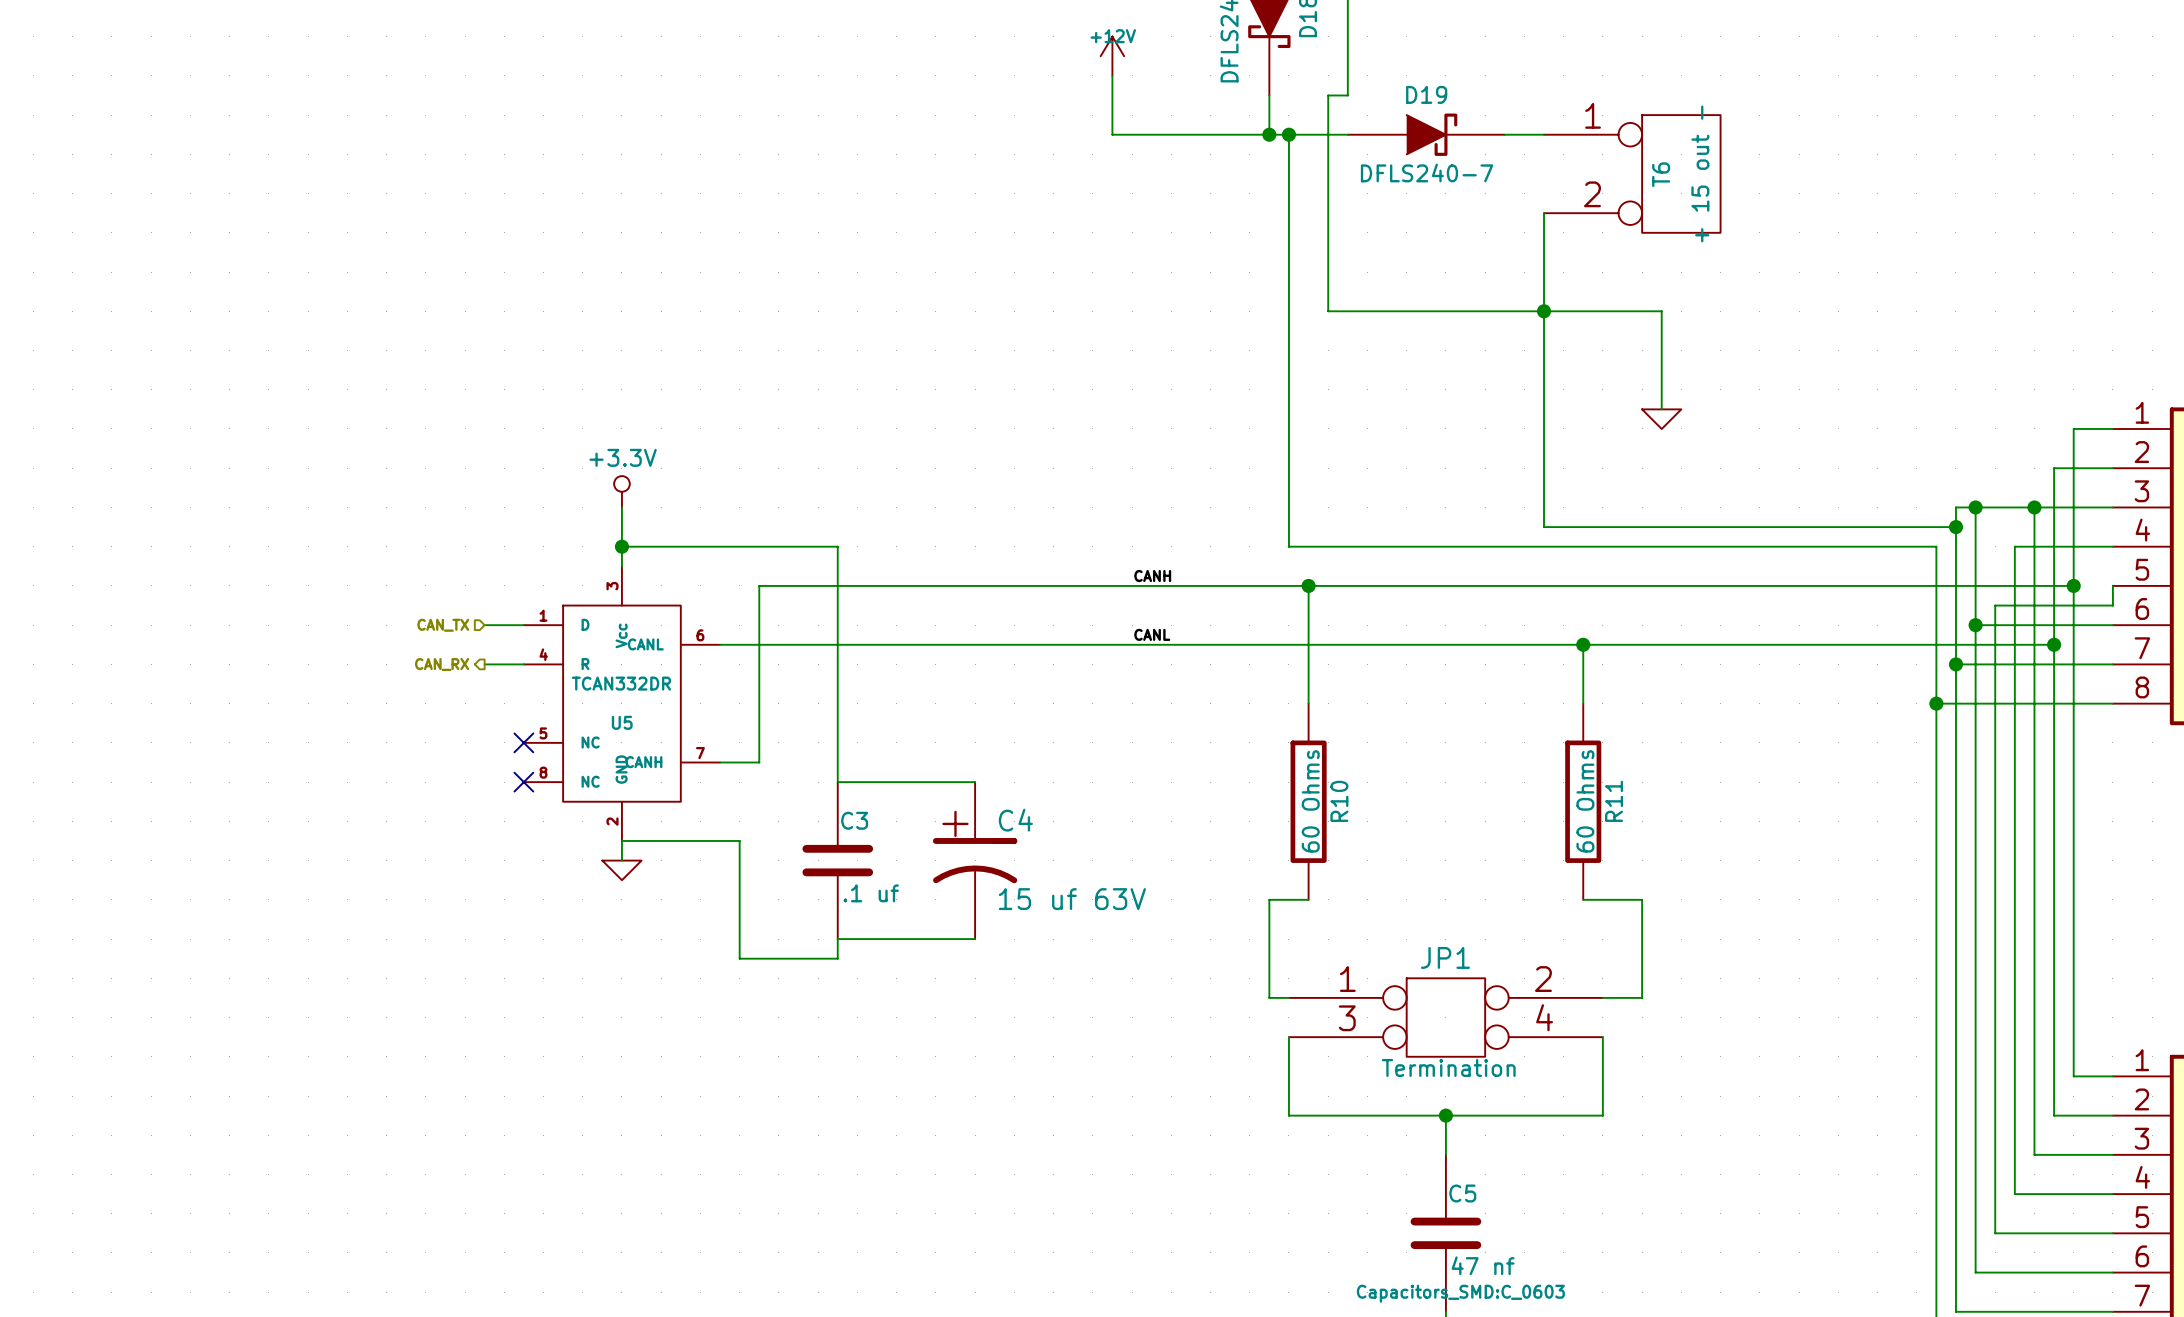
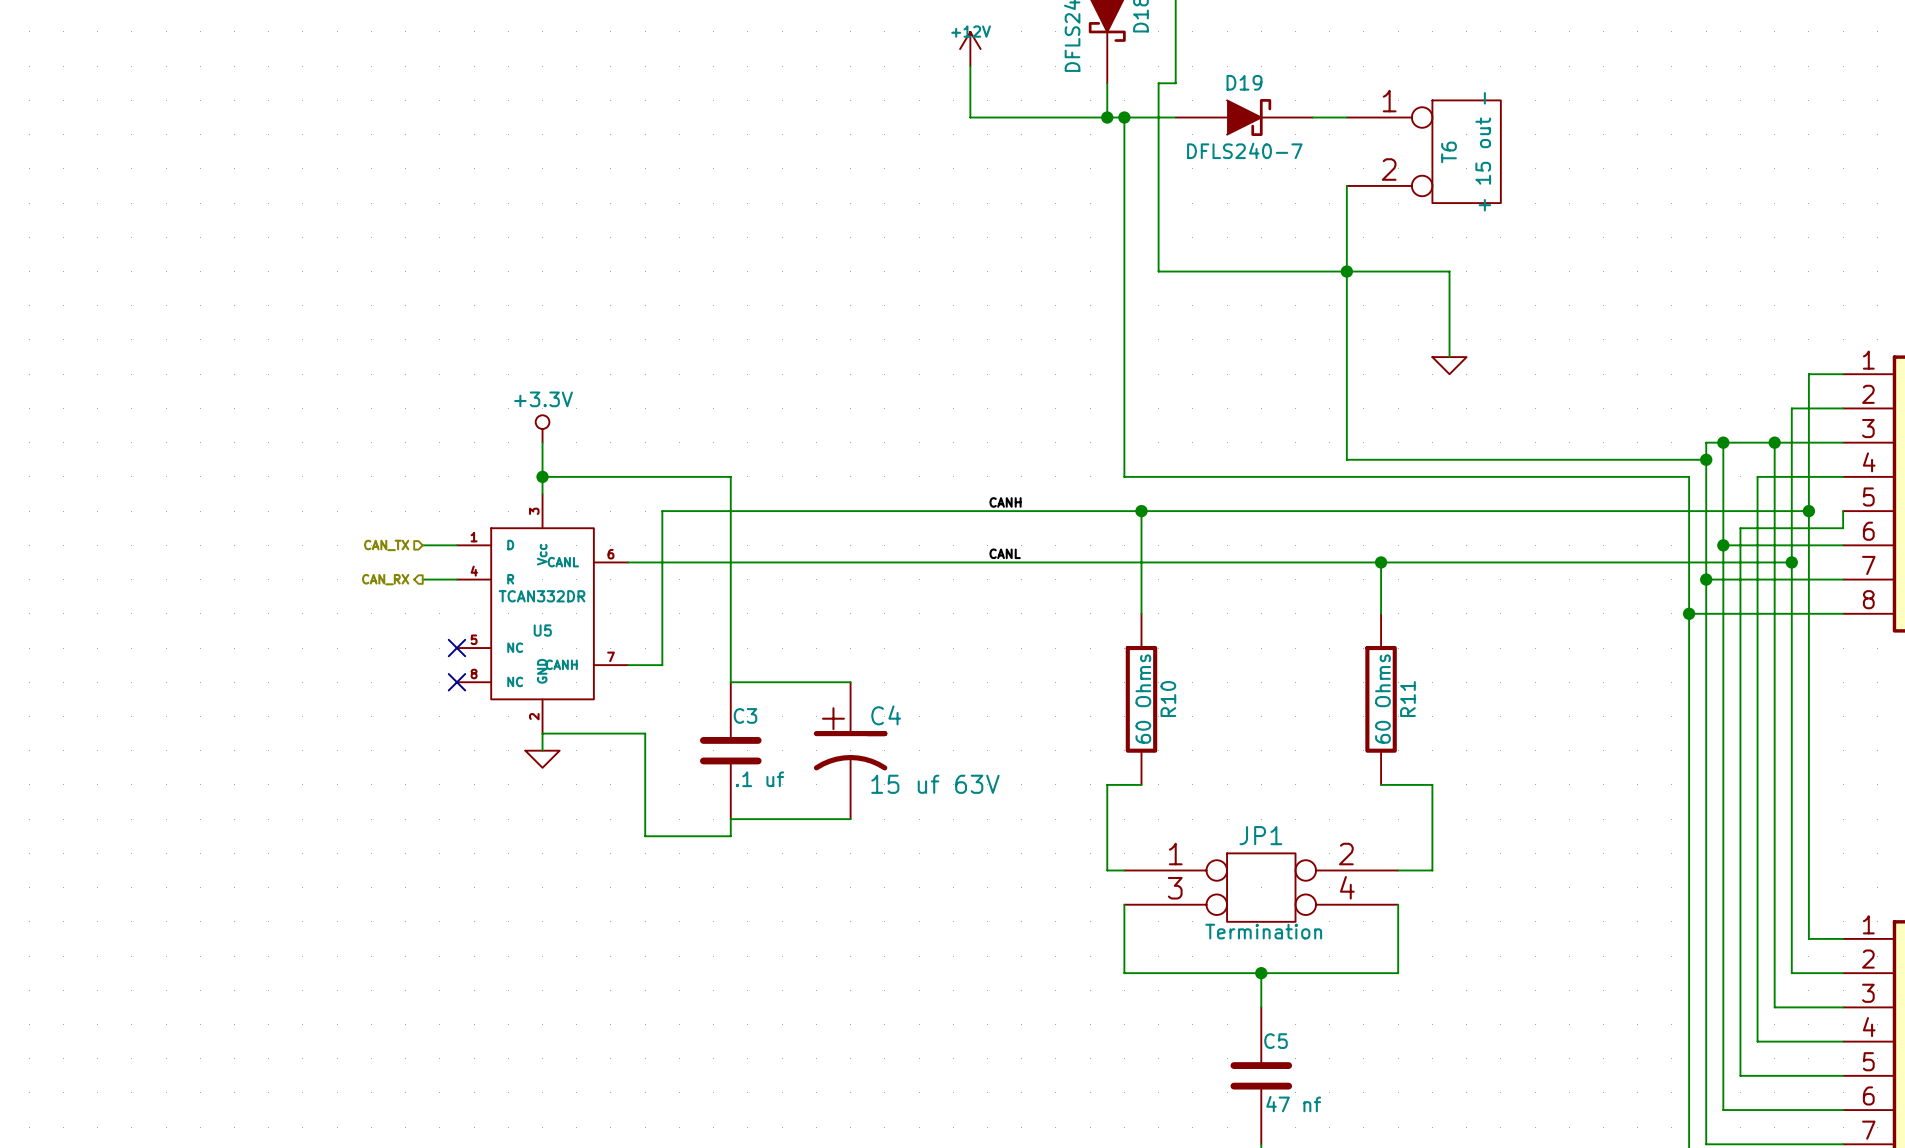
C5 text: Capacitors_SMD:C_0603 (1460, 1293) -> none

